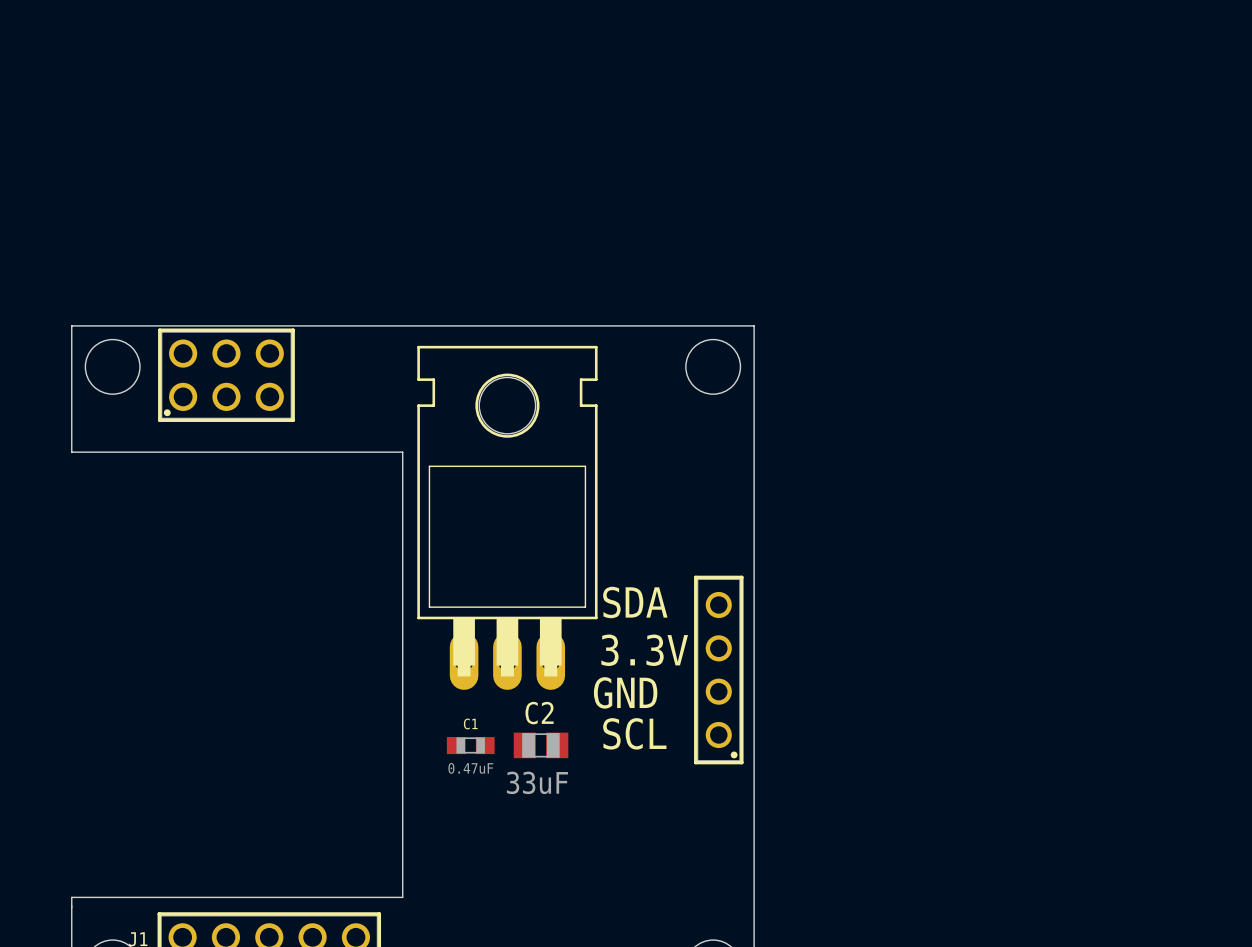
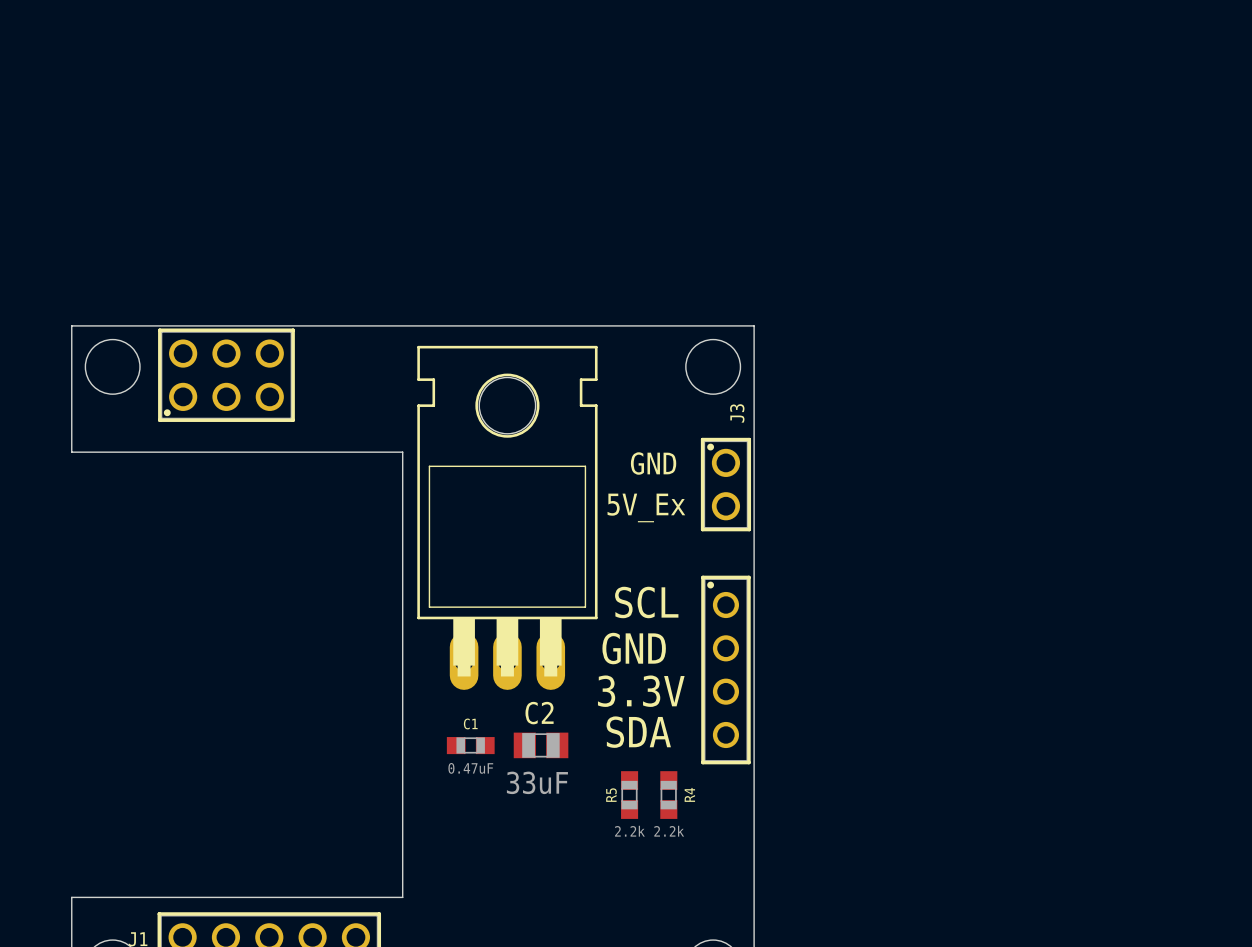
text: none -> GND (653, 463)
J3: none -> (725, 484)
text: none -> 5V_Ex (646, 507)
text: SDA (635, 602) -> SCL (646, 602)
text: 3.3V (644, 650) -> GND (634, 648)
part rotation: 0° (718, 670) -> 180° (725, 670)
text: GND (625, 692) -> 3.3V (641, 691)
text: SCL (634, 733) -> SDA (638, 732)
R5: none -> 2.2k (629, 795)
R4: none -> 2.2k (668, 795)

